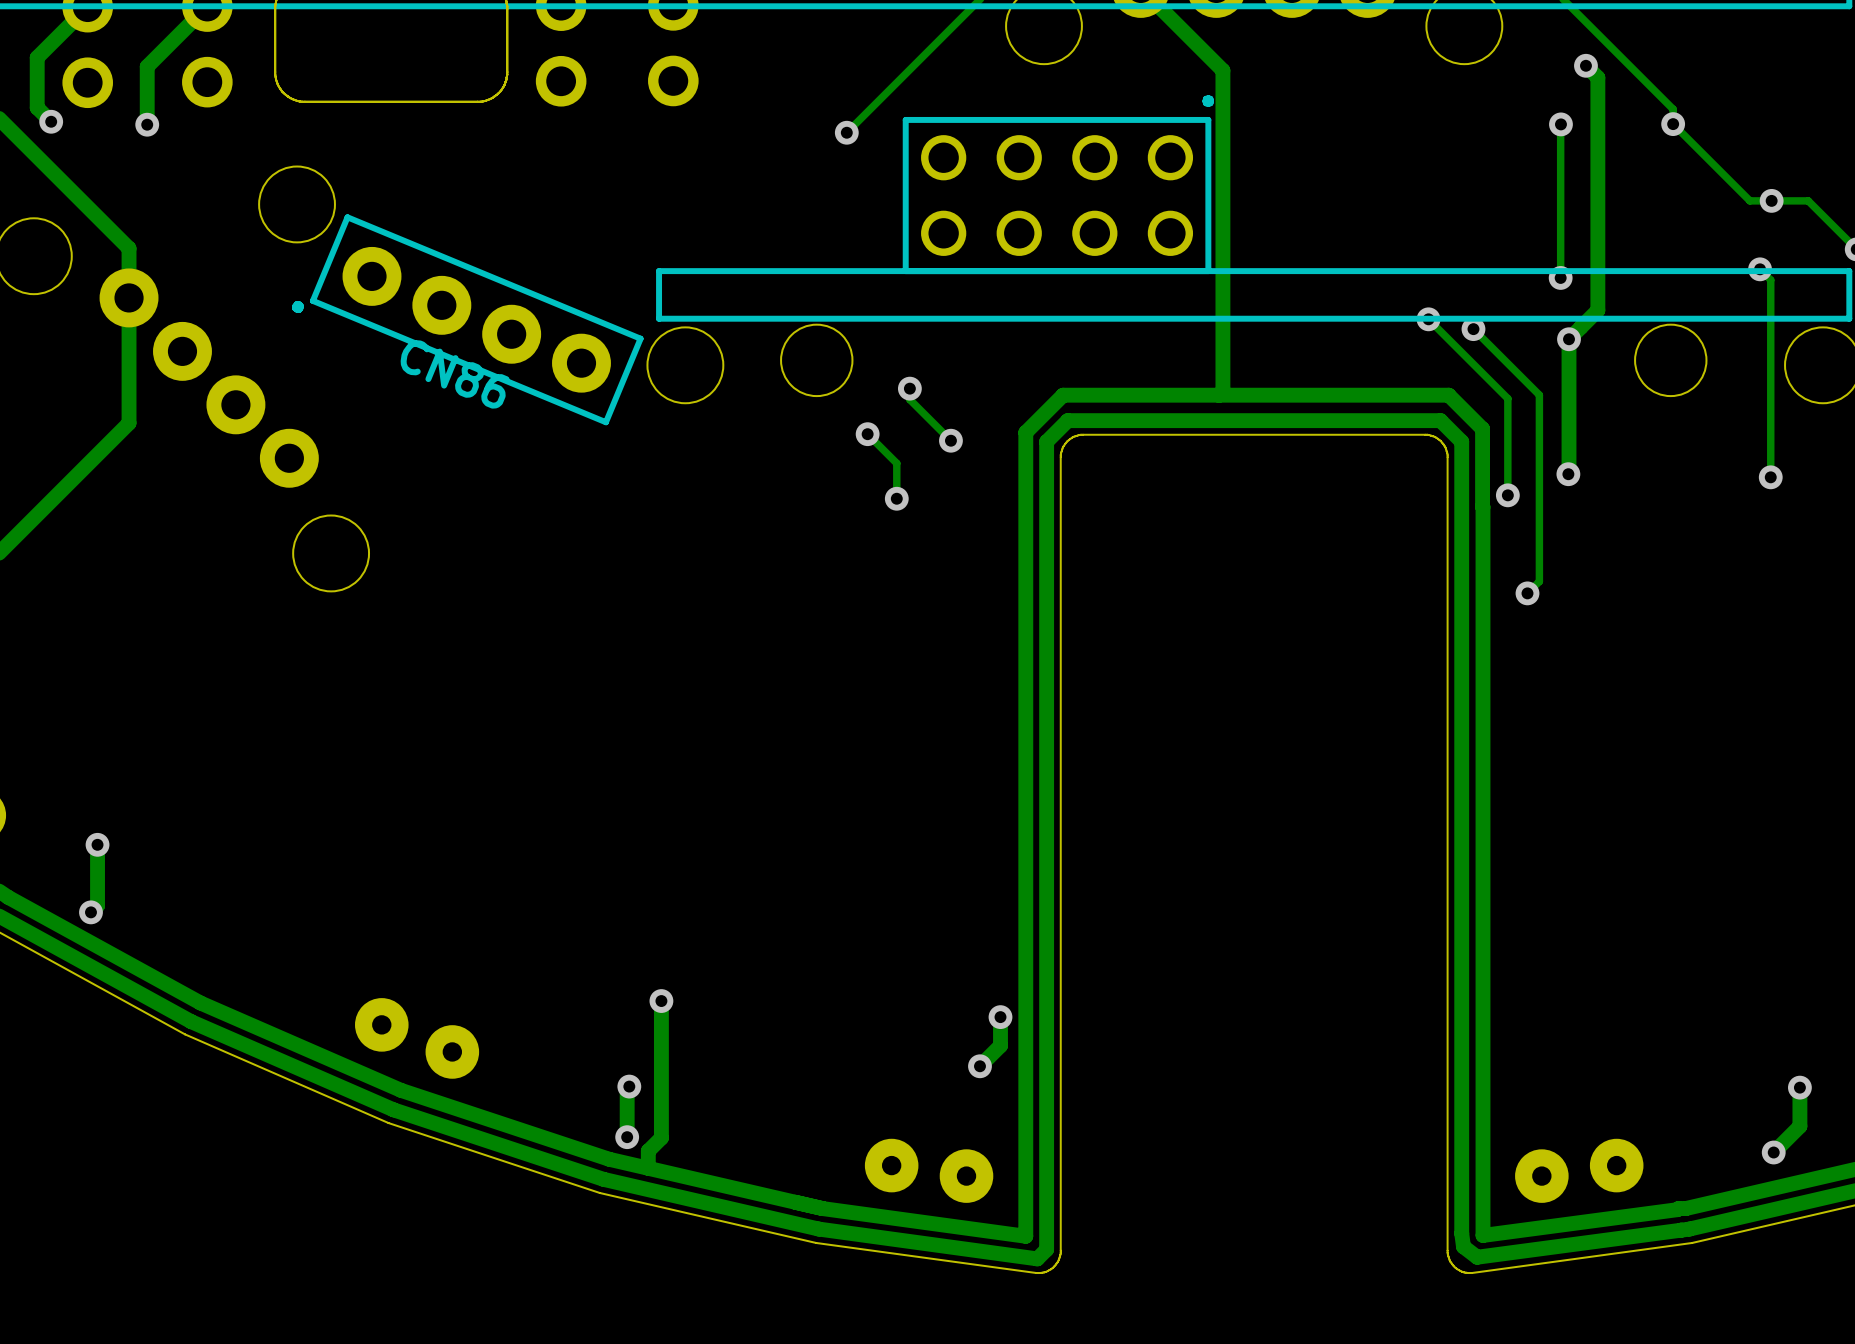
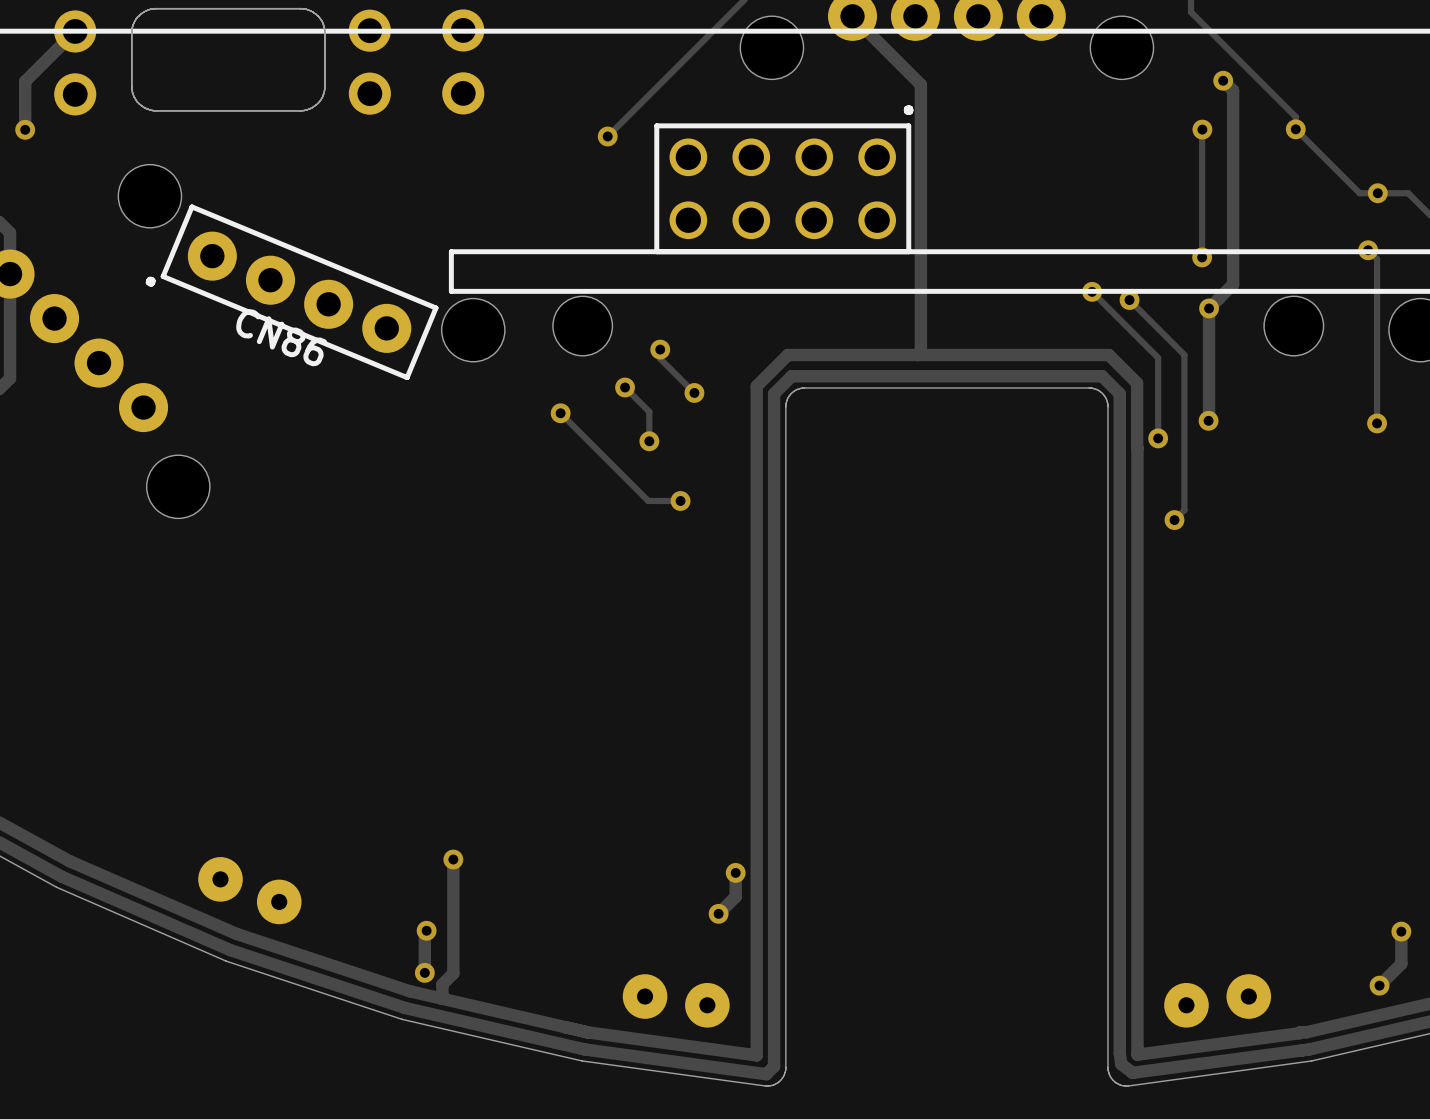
track: none -> (560, 413) (648, 500) (680, 500)
via: none -> (560, 413)
via: none -> (680, 500)

